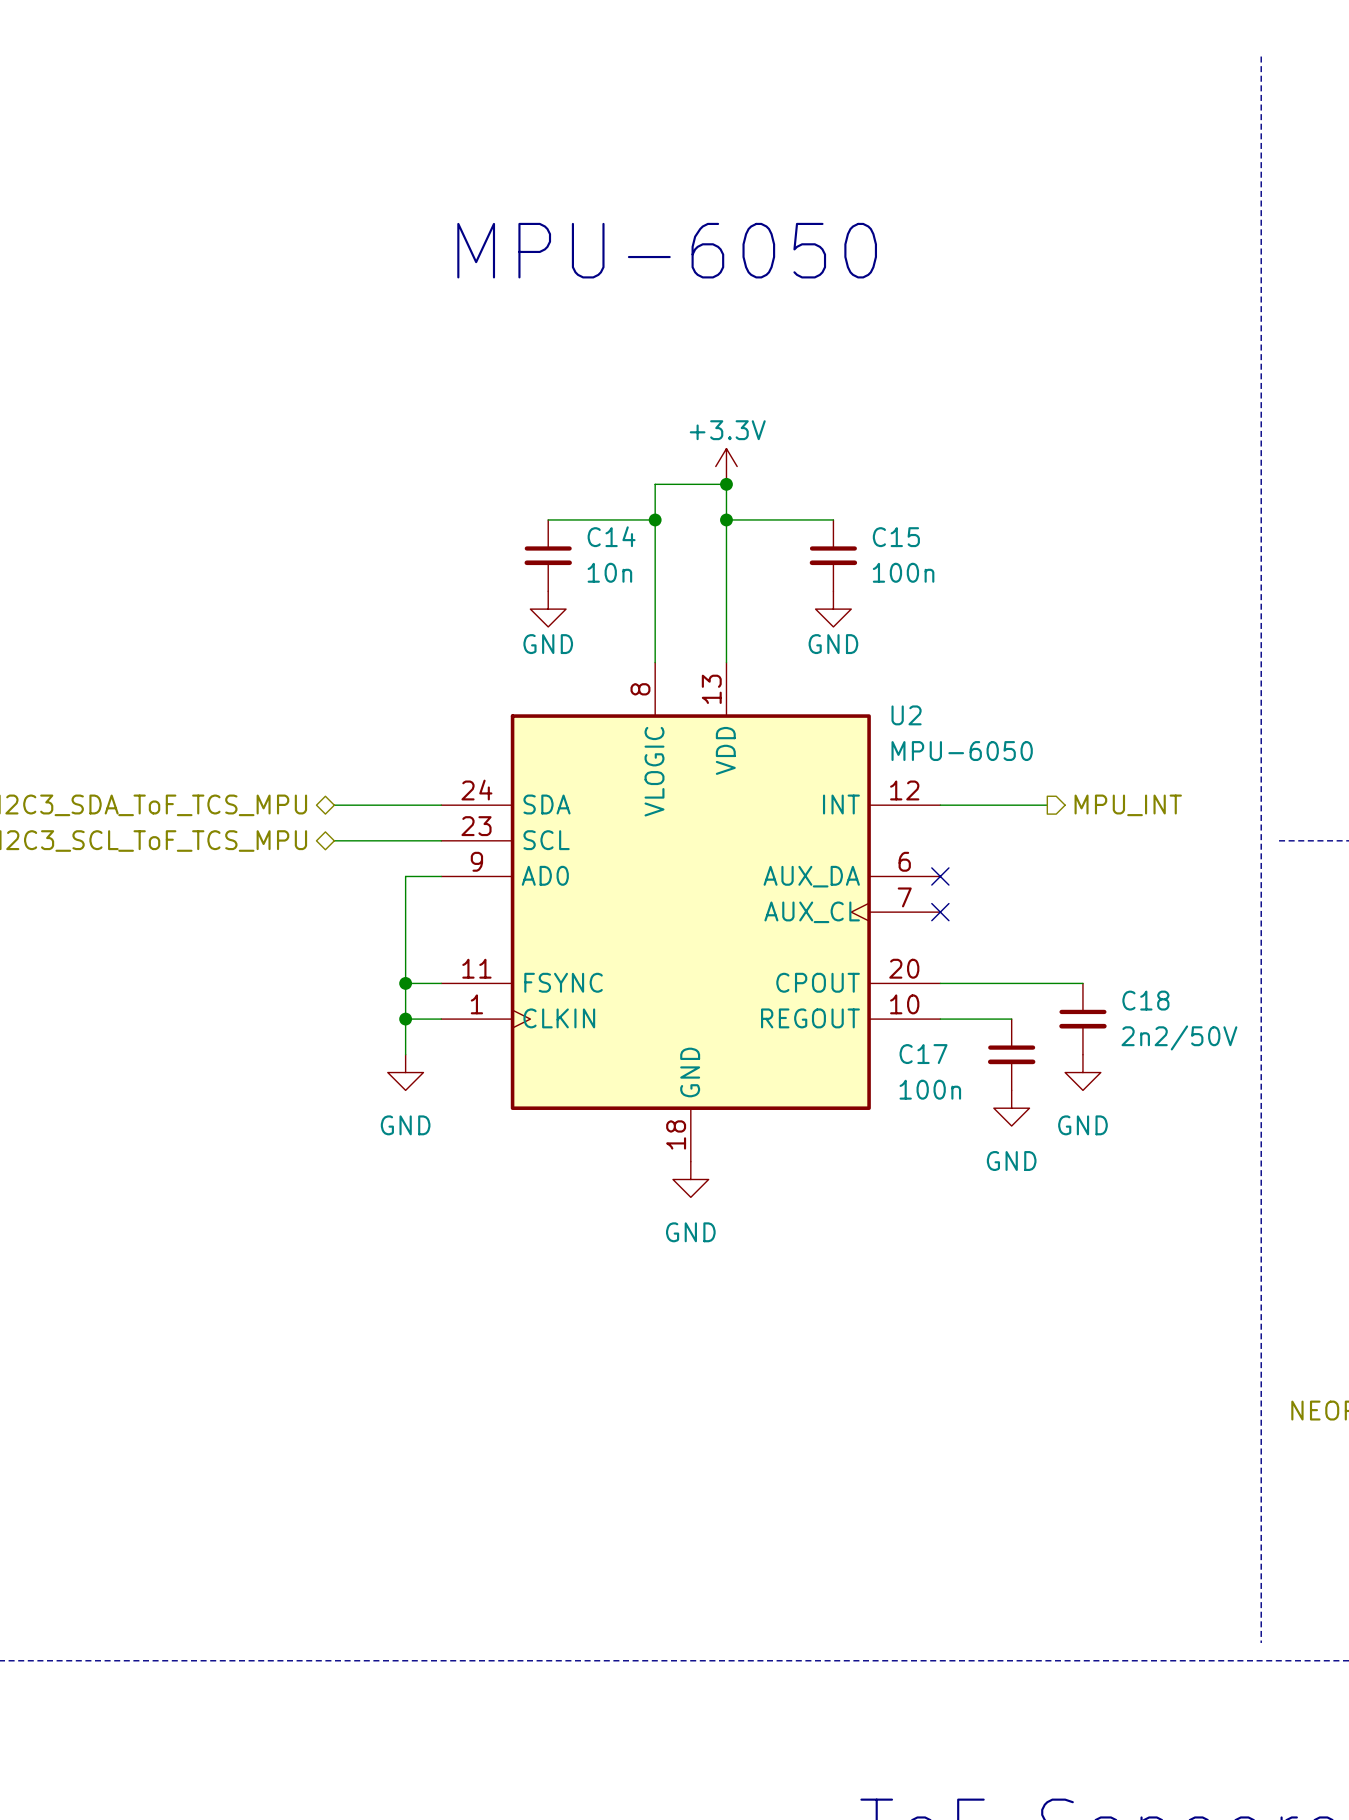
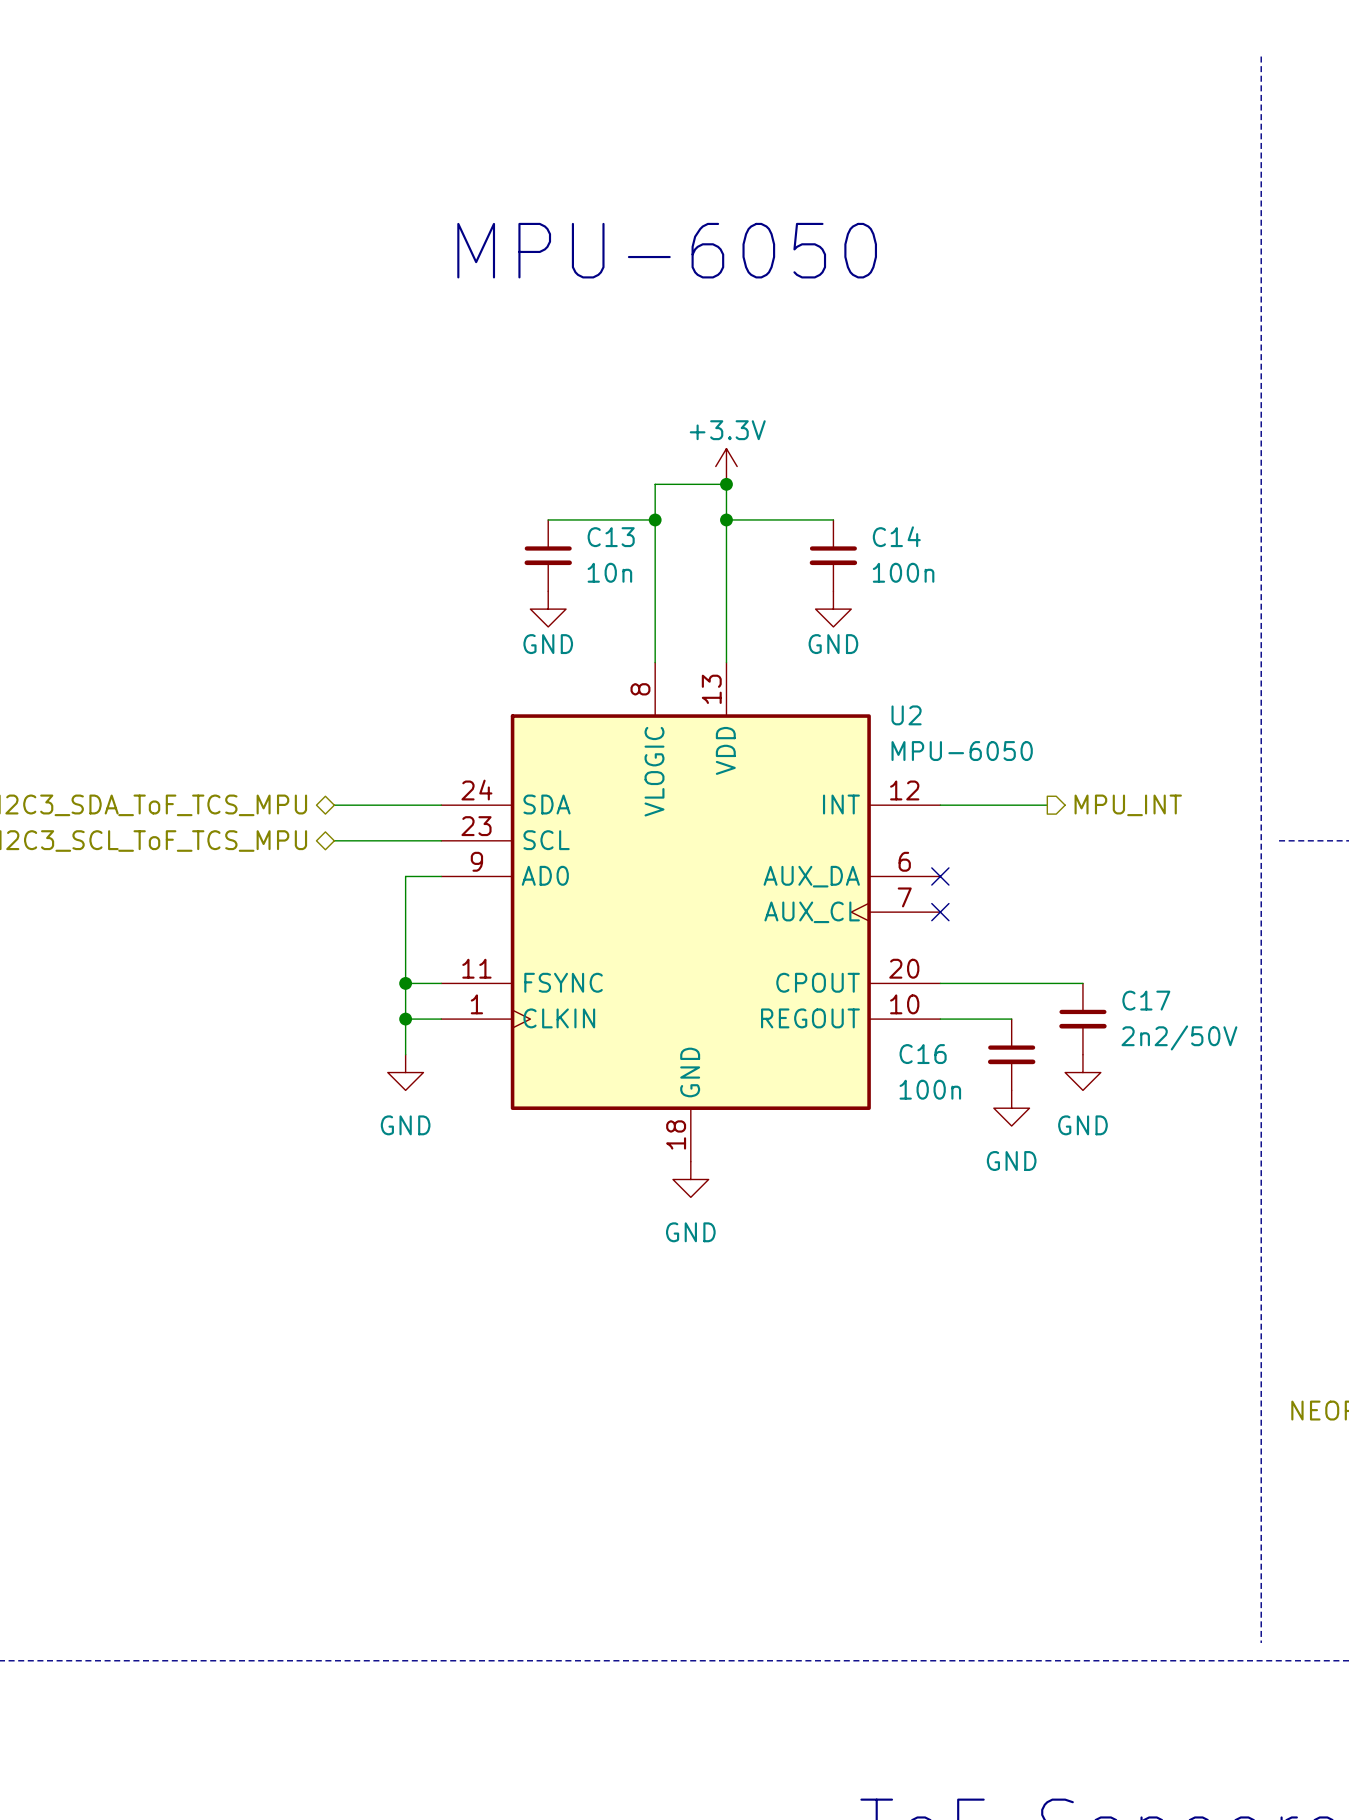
C14 name: C14 (611, 536) -> C13 (611, 537)
C15 name: C15 (896, 537) -> C14 (896, 536)
C18 name: C18 (1145, 1000) -> C17 (1146, 1000)
C17 name: C17 (923, 1054) -> C16 (923, 1054)

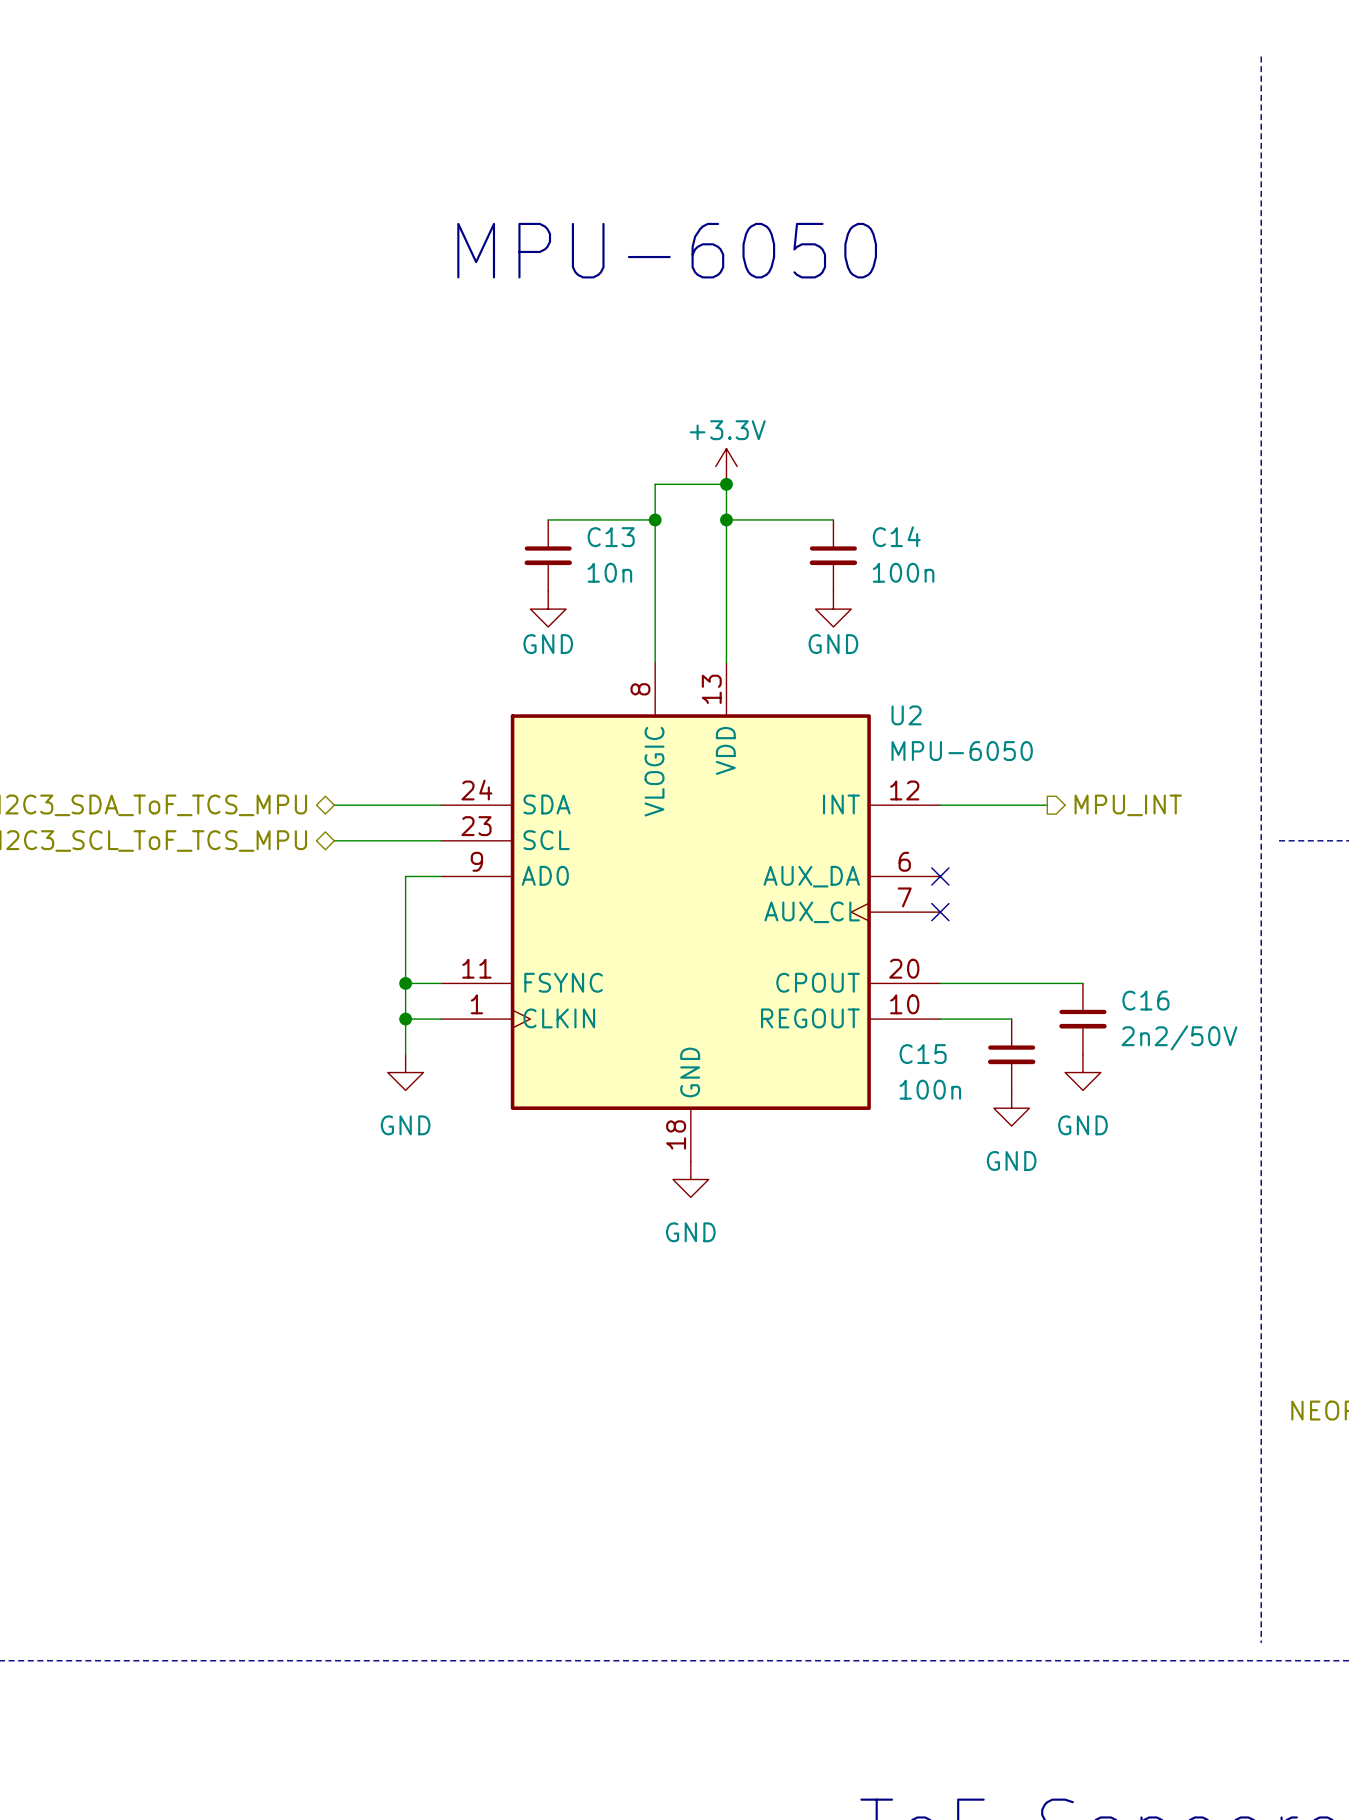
C17 name: C17 (1146, 1000) -> C16 (1145, 1000)
C16 name: C16 (923, 1054) -> C15 (923, 1054)

